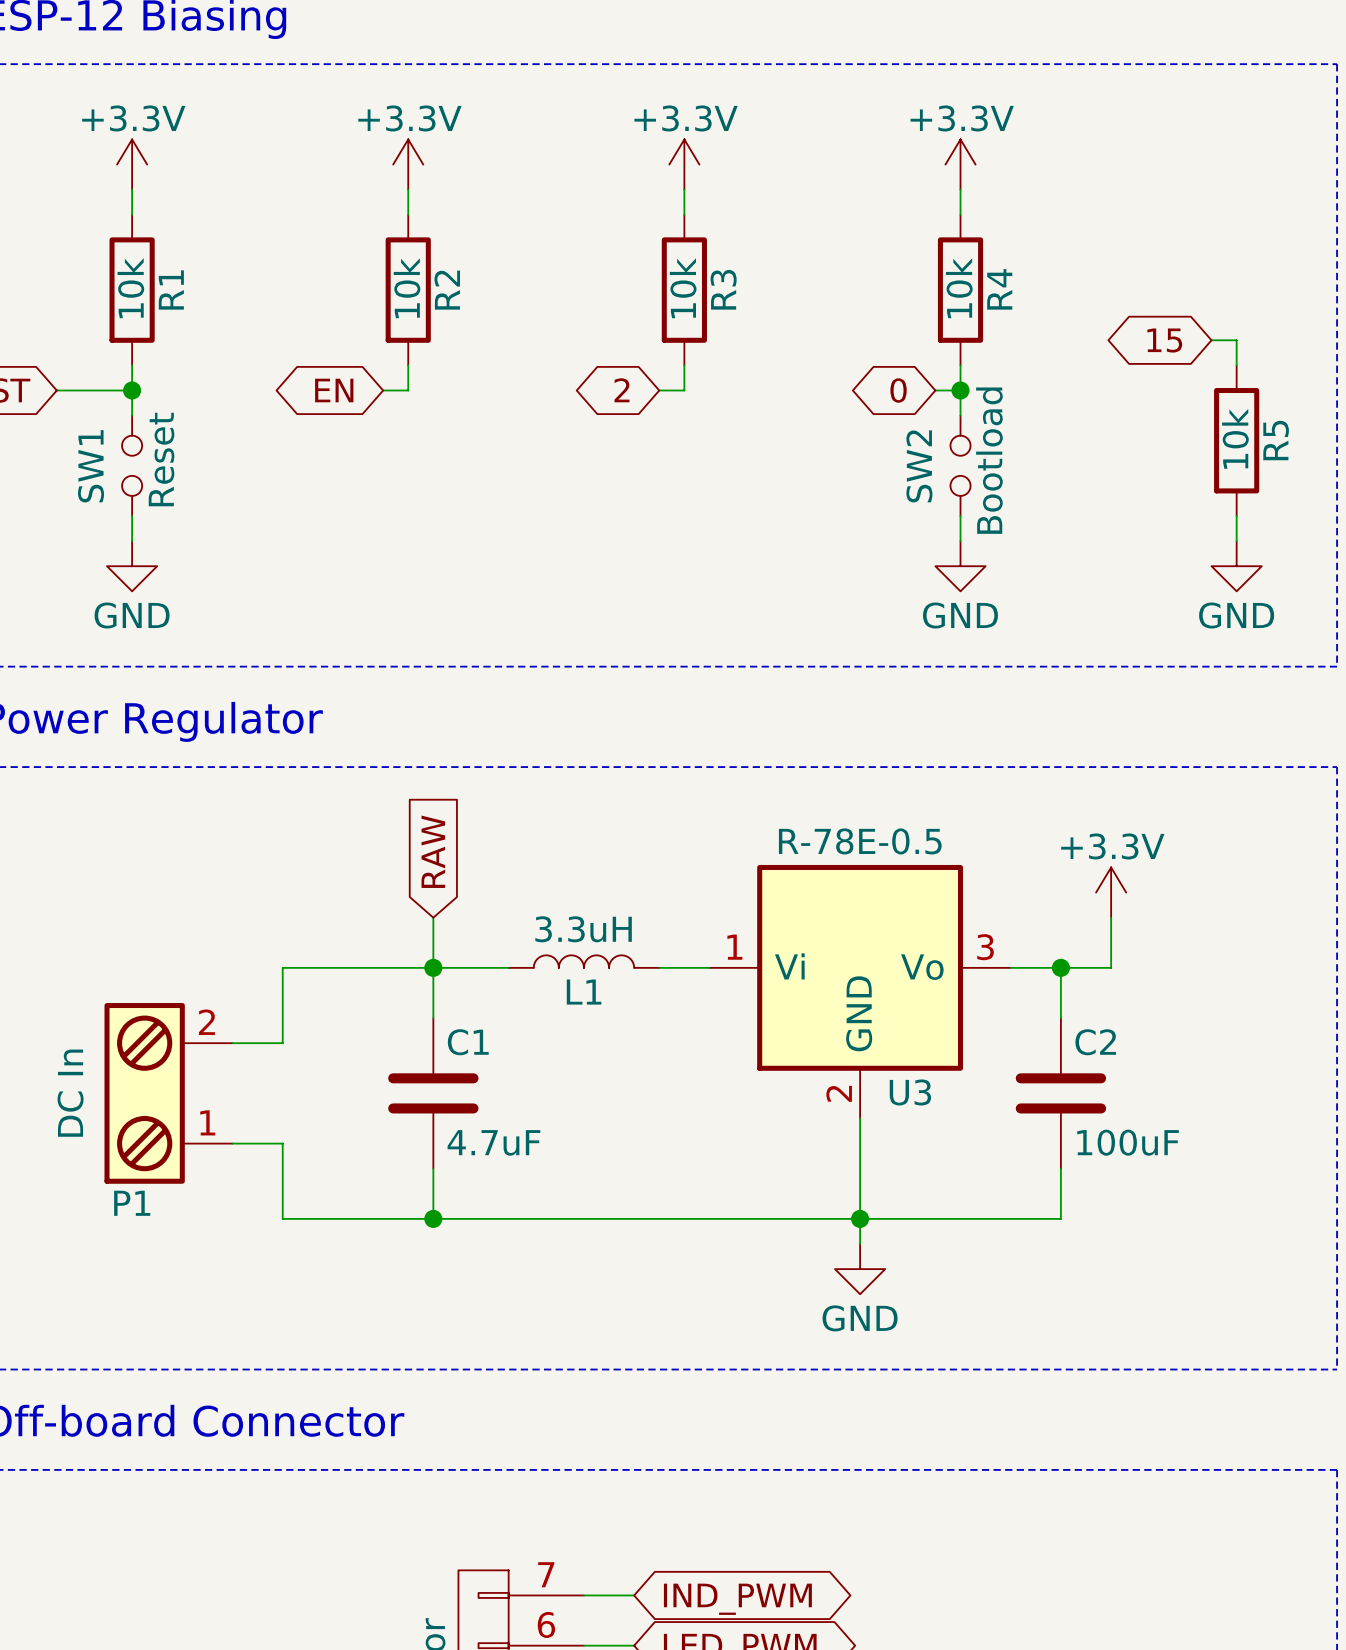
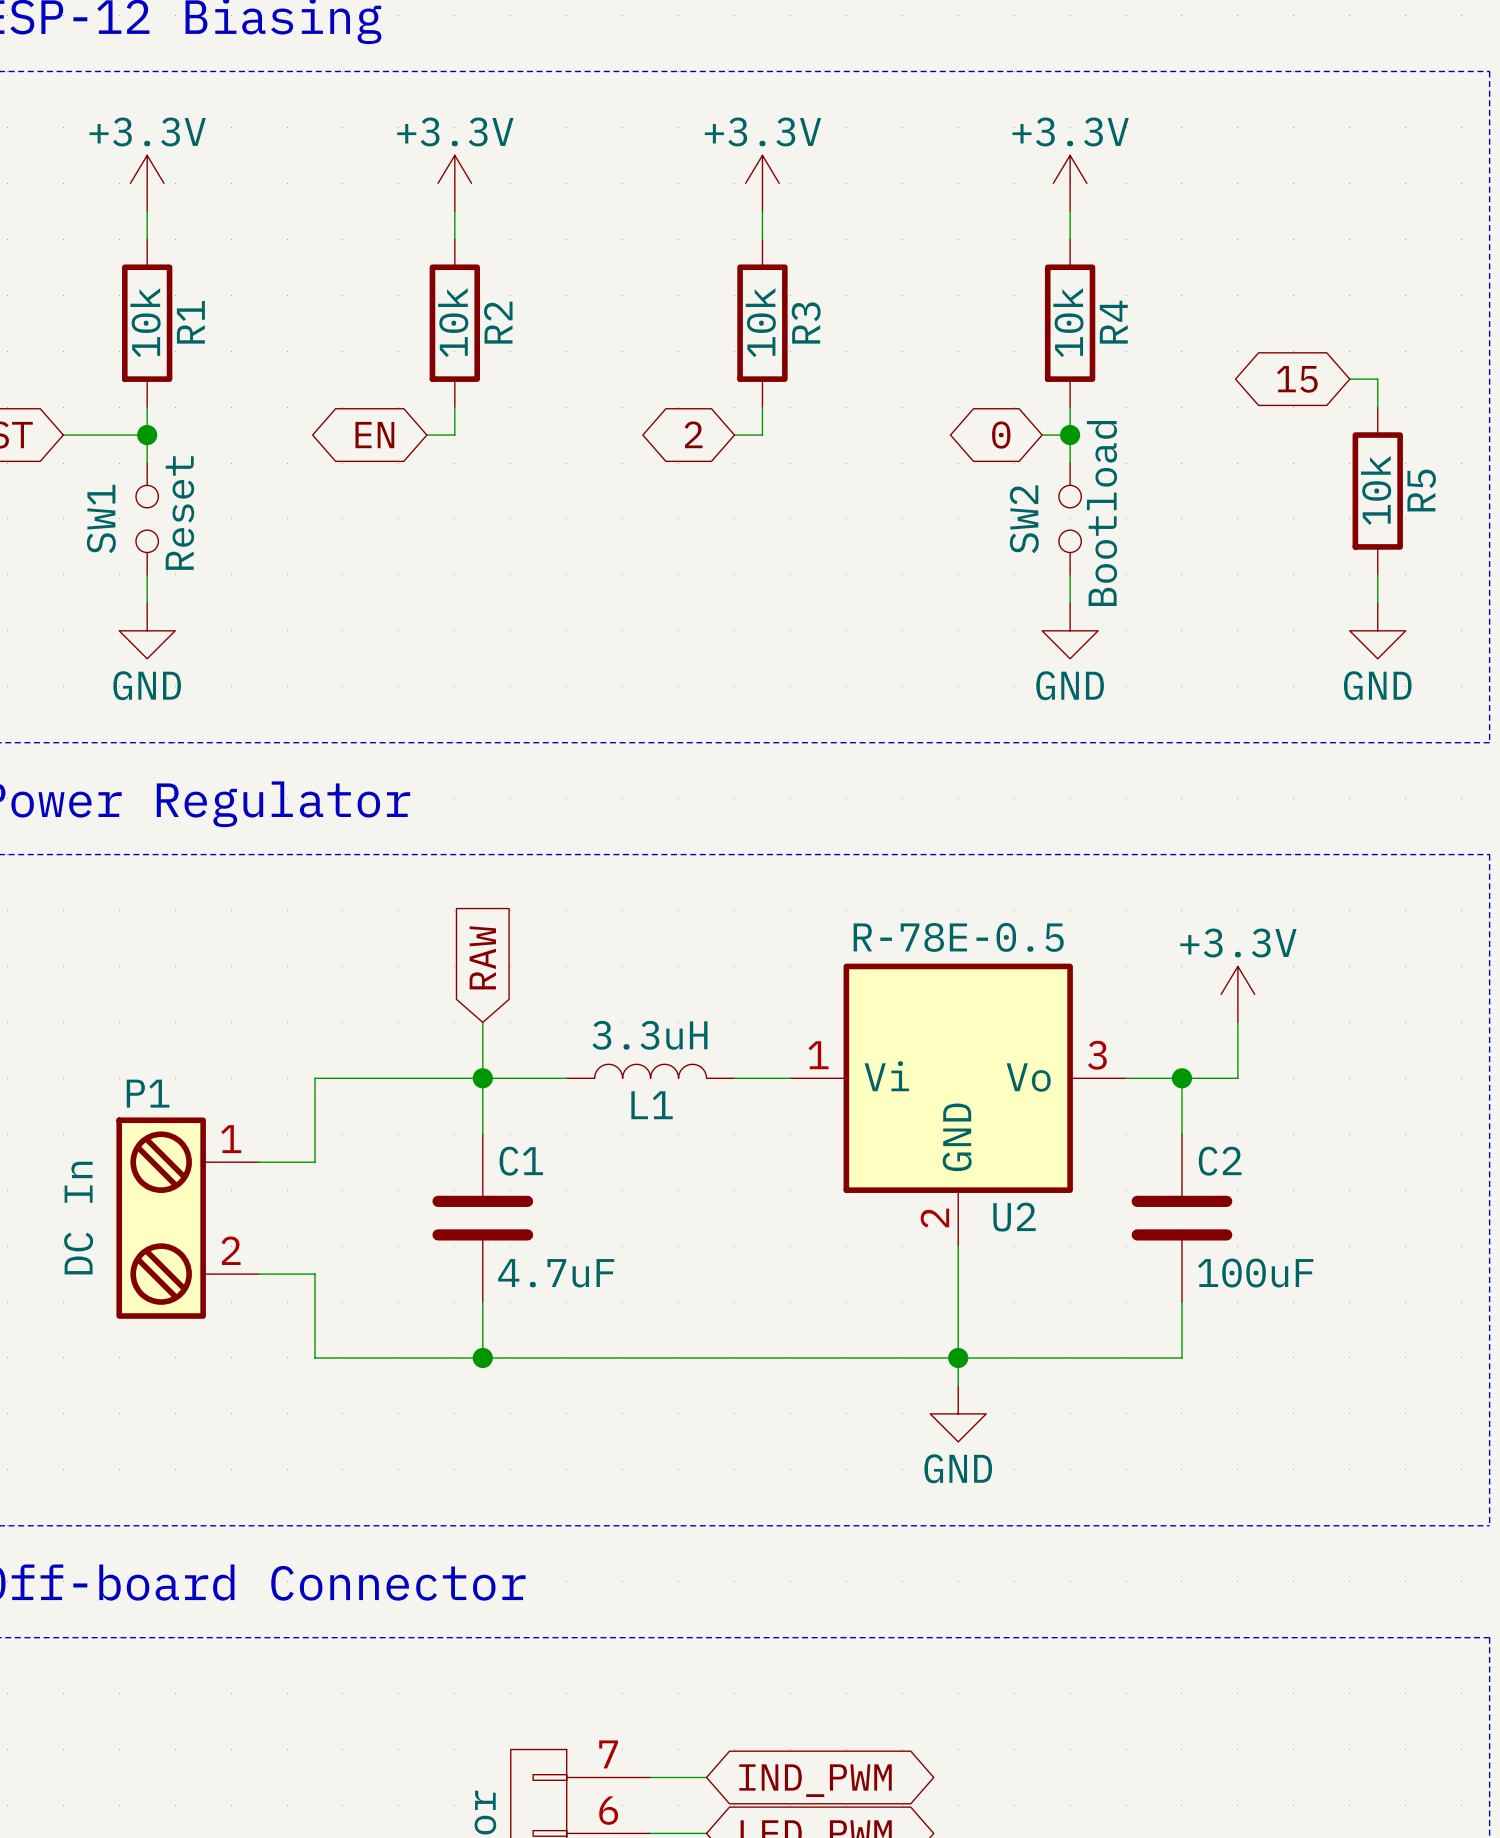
U3 name: U3 (910, 1092) -> U2 (1014, 1217)
P1 flip: as is (144, 1093) -> up-down (161, 1218)

